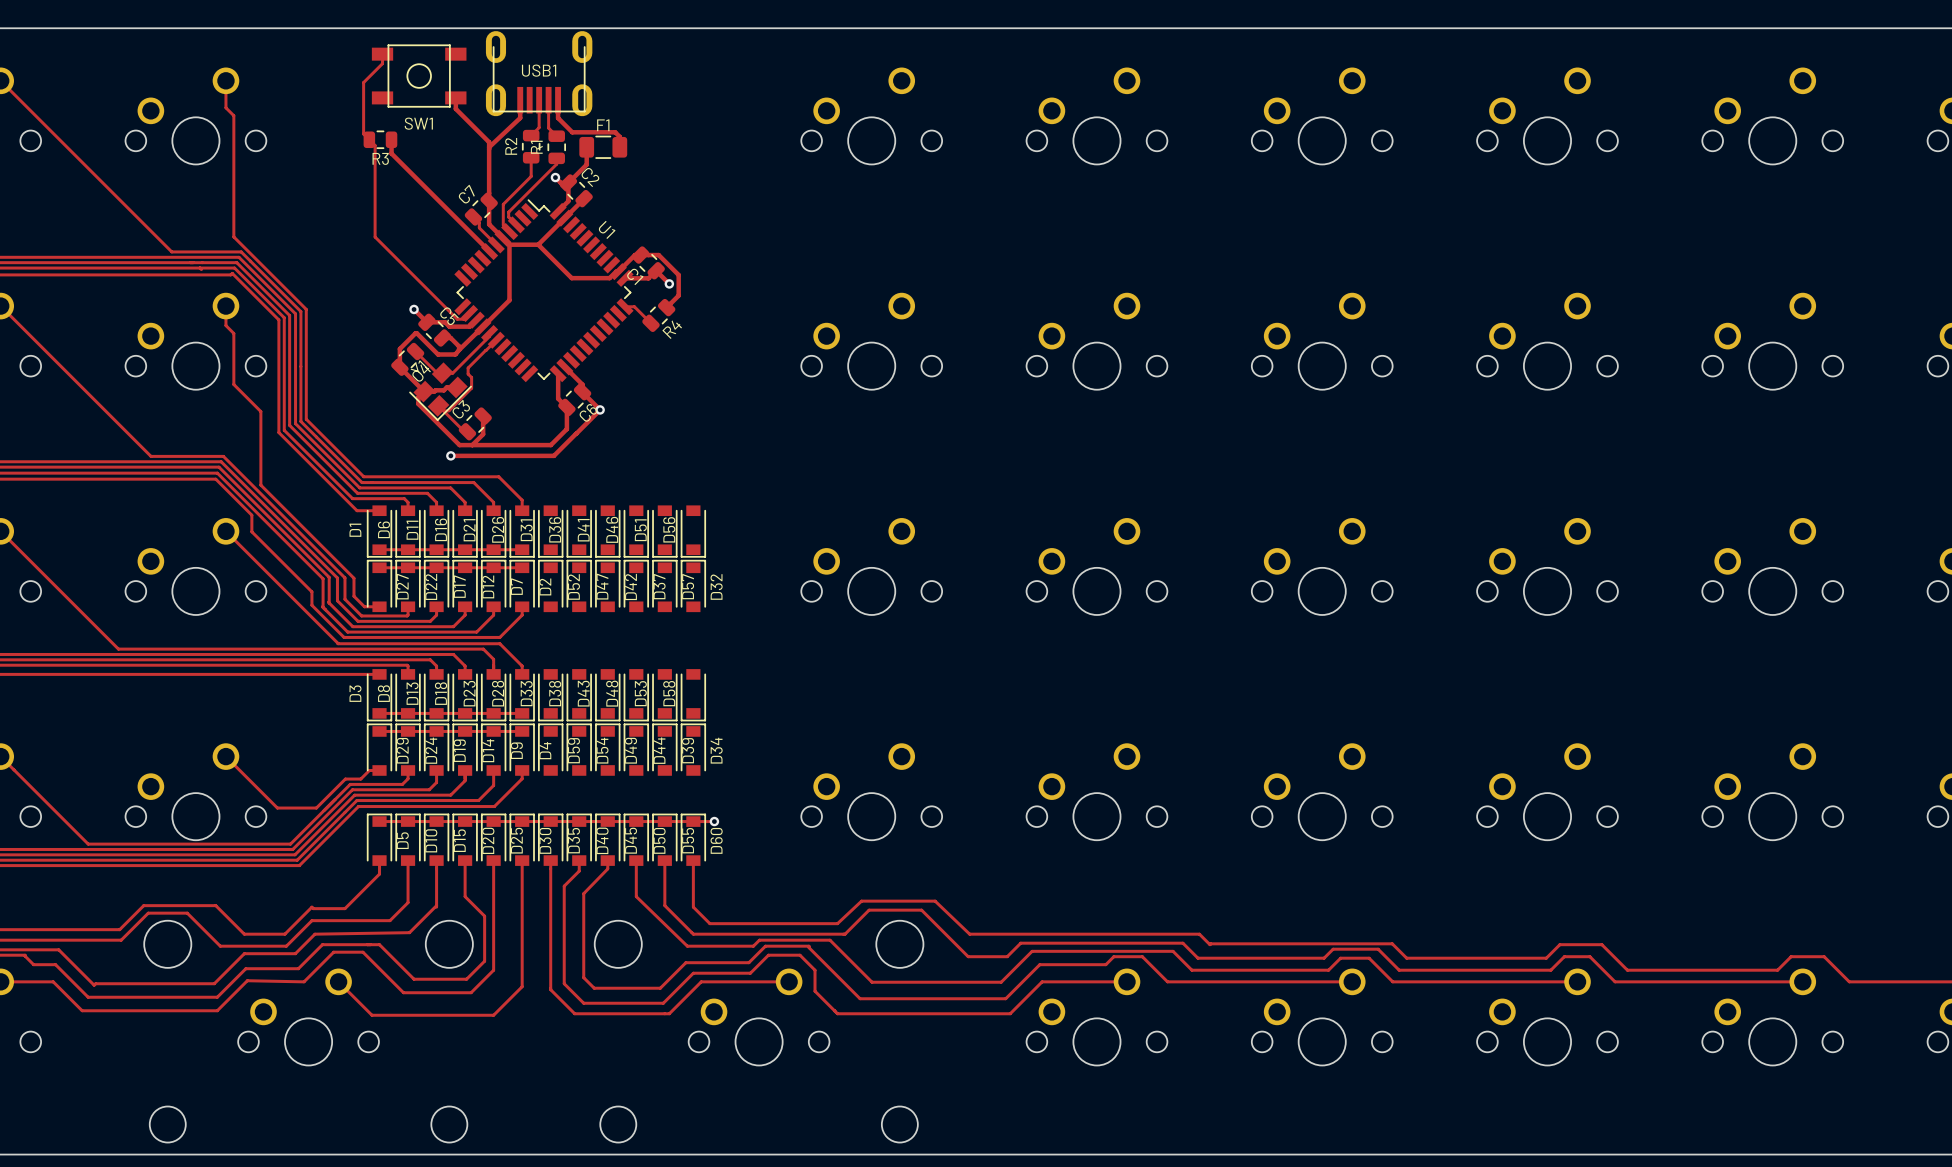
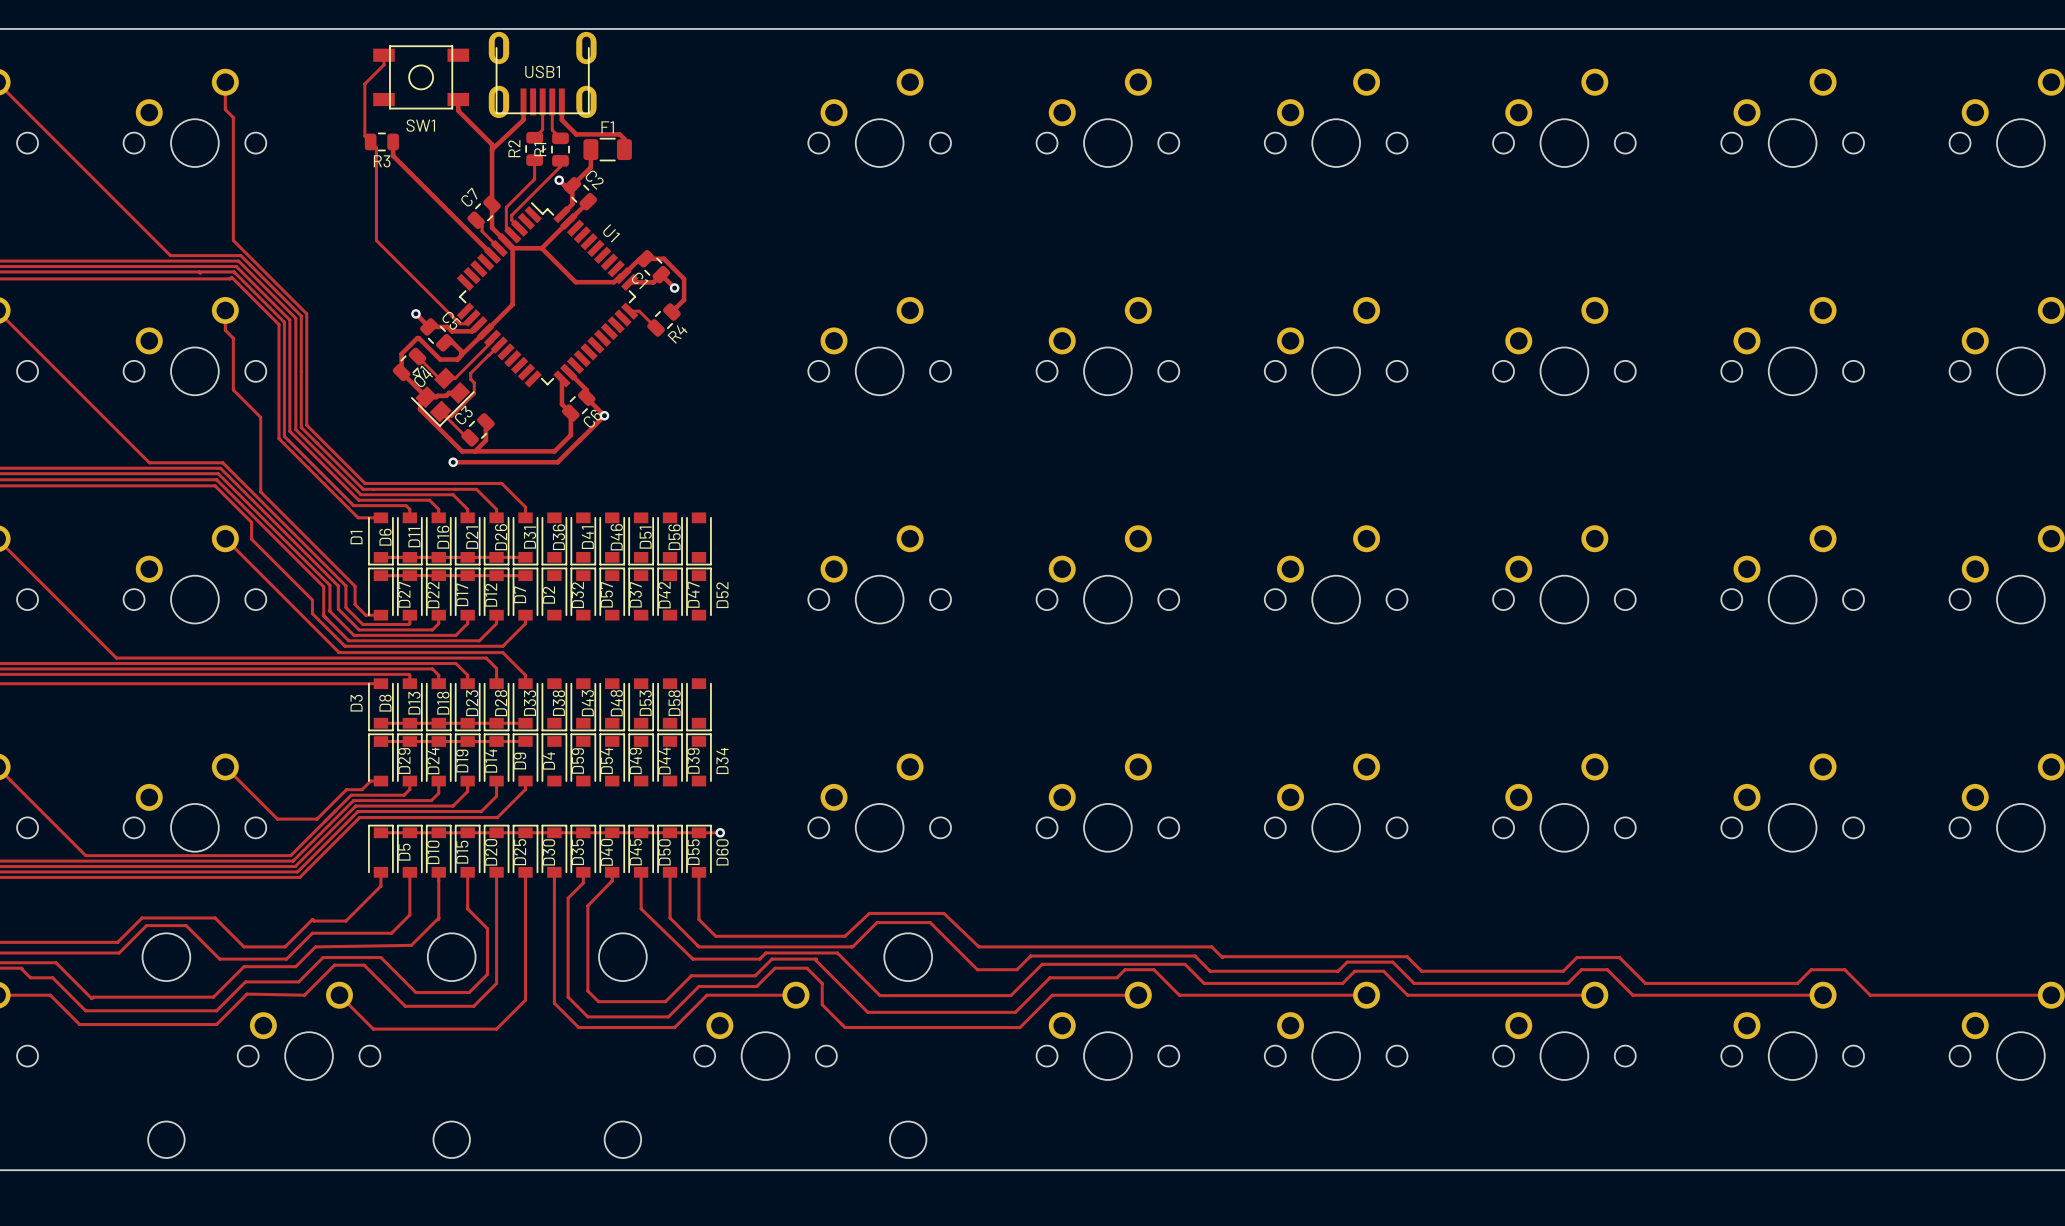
D52 name: D52 (573, 586) -> D32 (577, 595)
D47 name: D47 (602, 586) -> D57 (606, 594)
D42 name: D42 (630, 586) -> D37 (635, 594)
D37 name: D37 (659, 586) -> D42 (664, 595)
D57 name: D57 (688, 586) -> D47 (693, 594)
D32 name: D32 (716, 586) -> D52 (722, 595)

